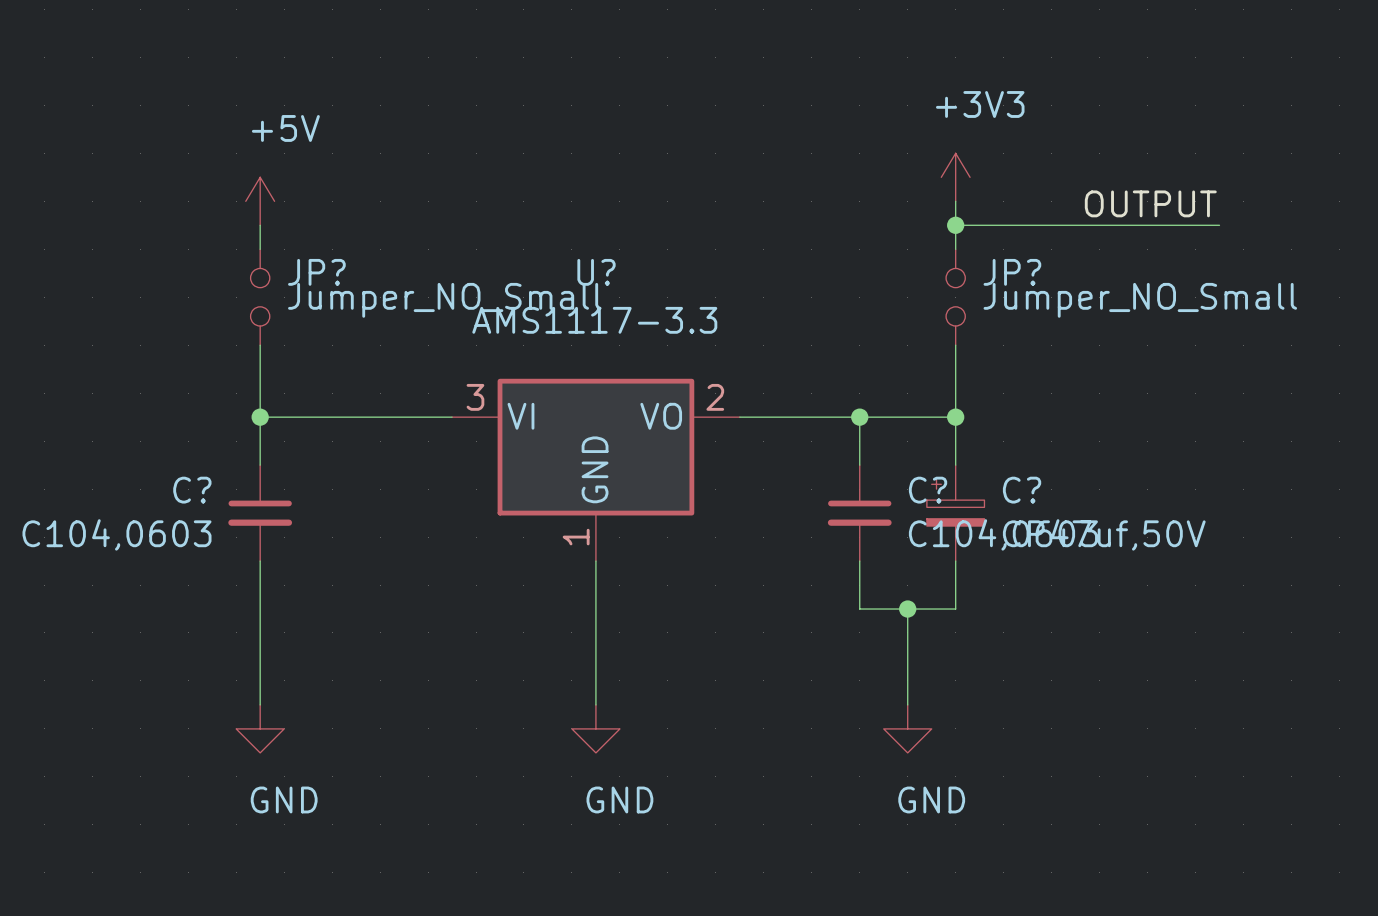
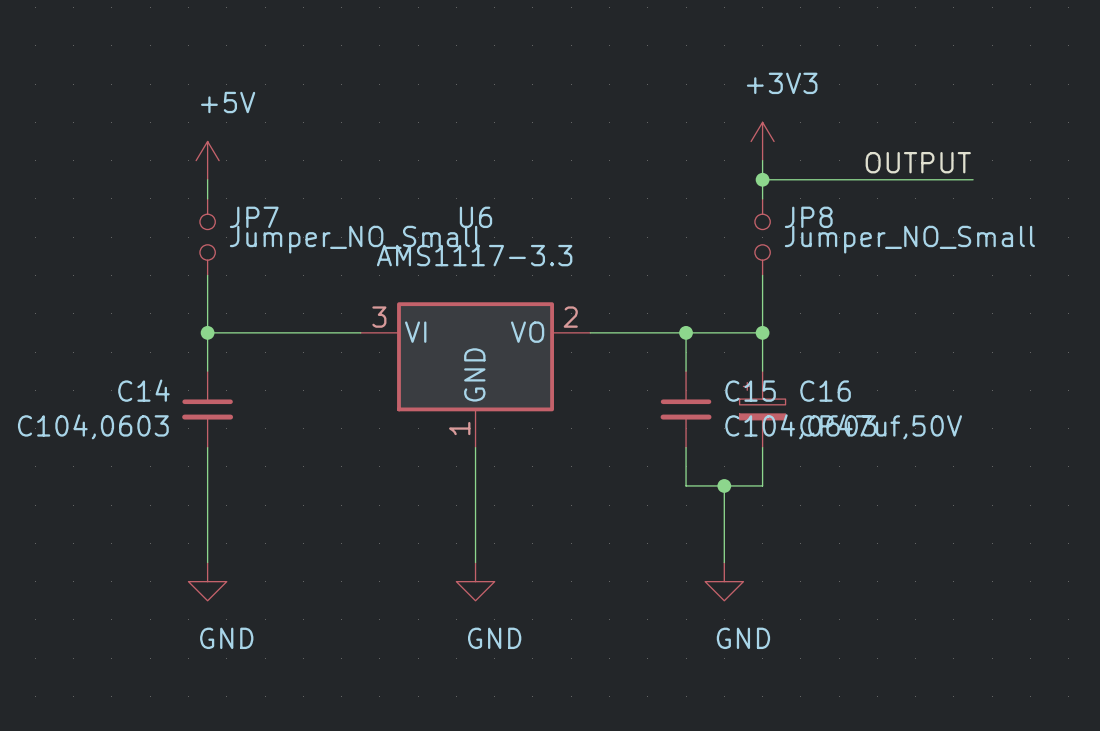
JP? name: JP? (316, 272) -> JP7 (254, 217)
U? name: U? (596, 272) -> U6 (475, 217)
JP? name: JP? (1012, 272) -> JP8 (808, 217)
C? name: C? (192, 490) -> C14 (143, 390)
C? name: C? (928, 490) -> C15 (750, 391)
C? name: C? (1022, 490) -> C16 (825, 391)

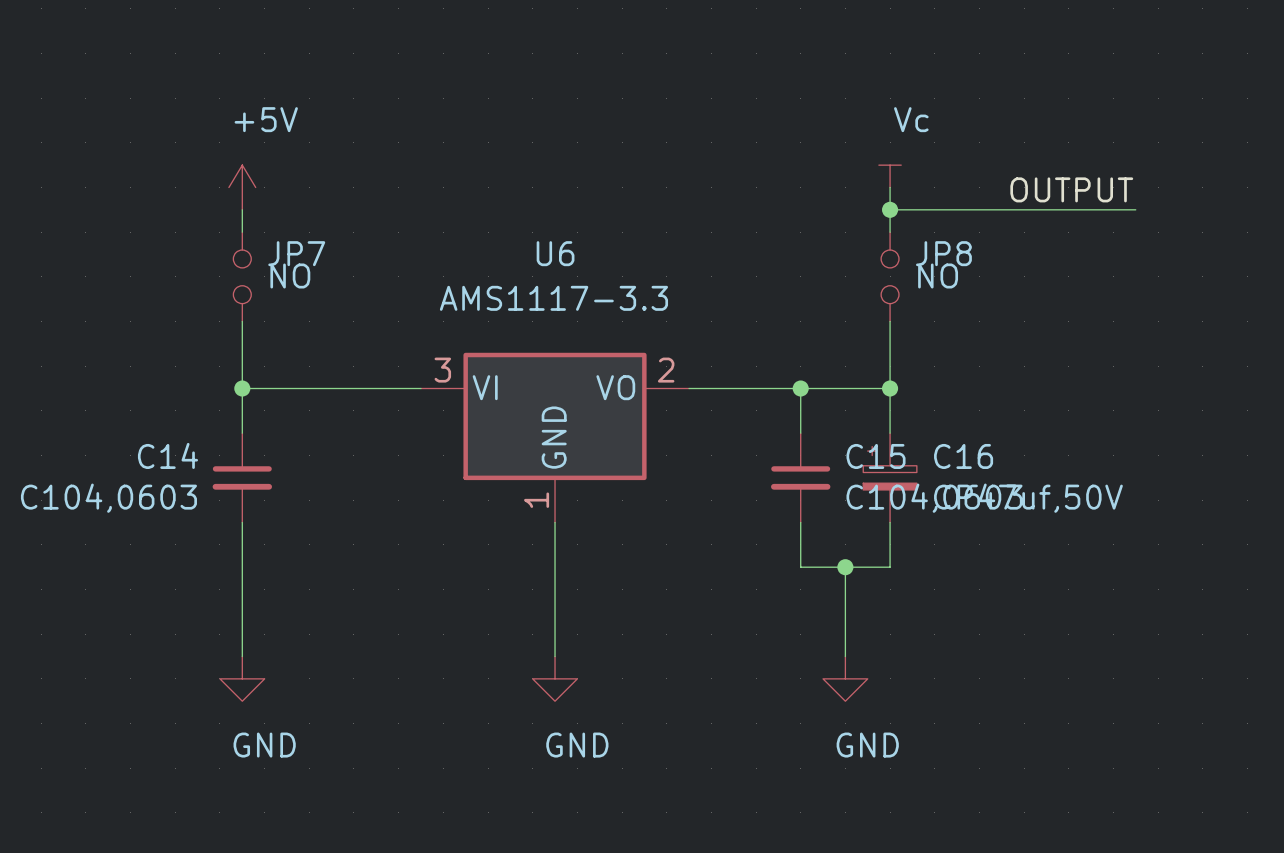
power symbol: +3V3 (762, 141) -> Vc (890, 176)
JP7 value: Jumper_NO_Small (354, 239) -> NO (290, 275)
JP8 value: Jumper_NO_Small (909, 239) -> NO (938, 275)

